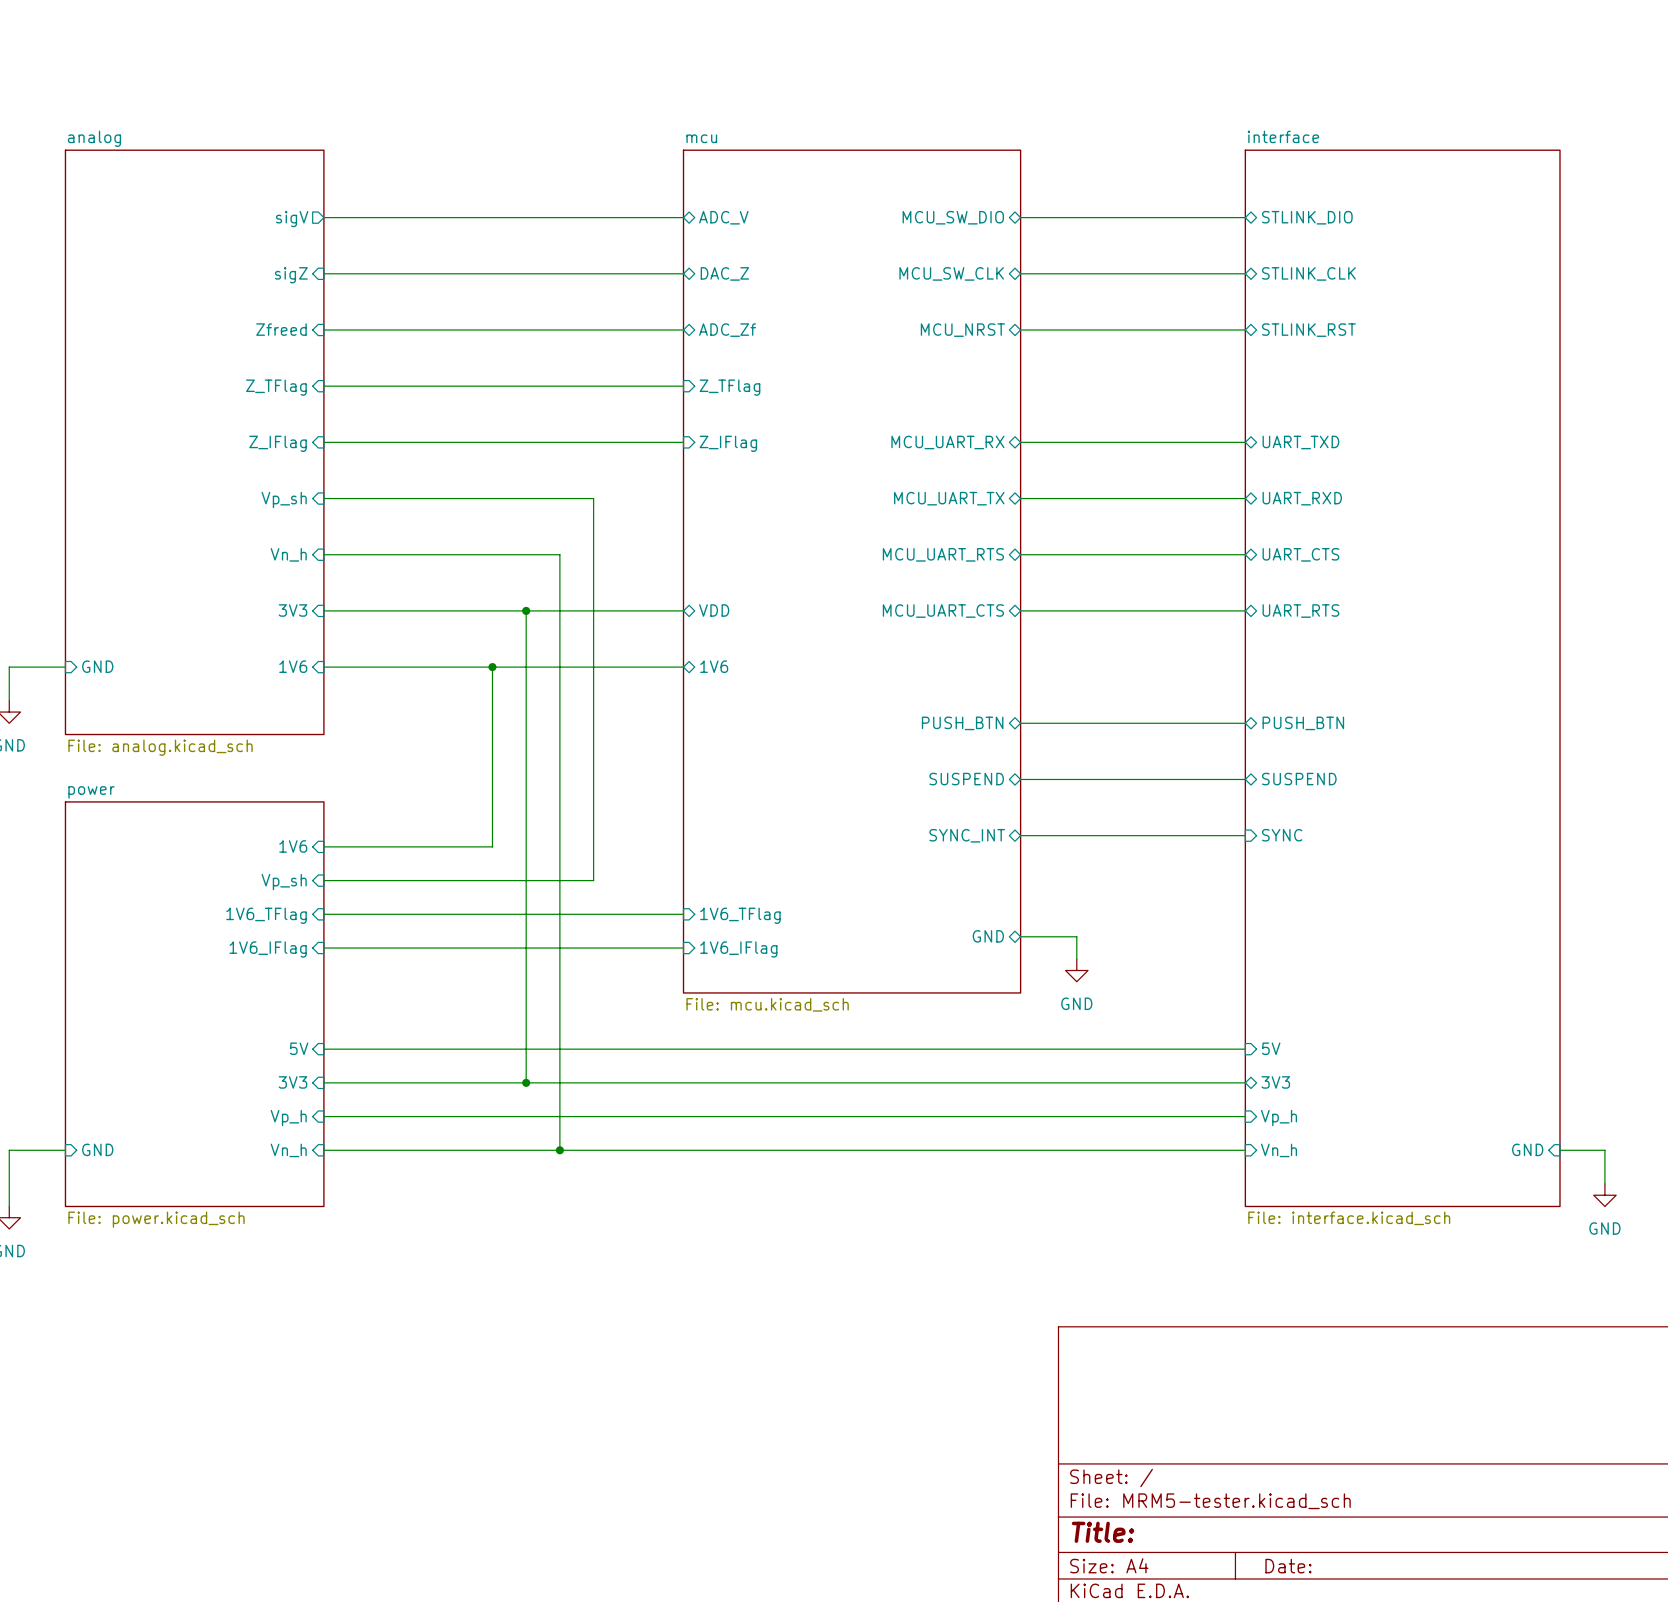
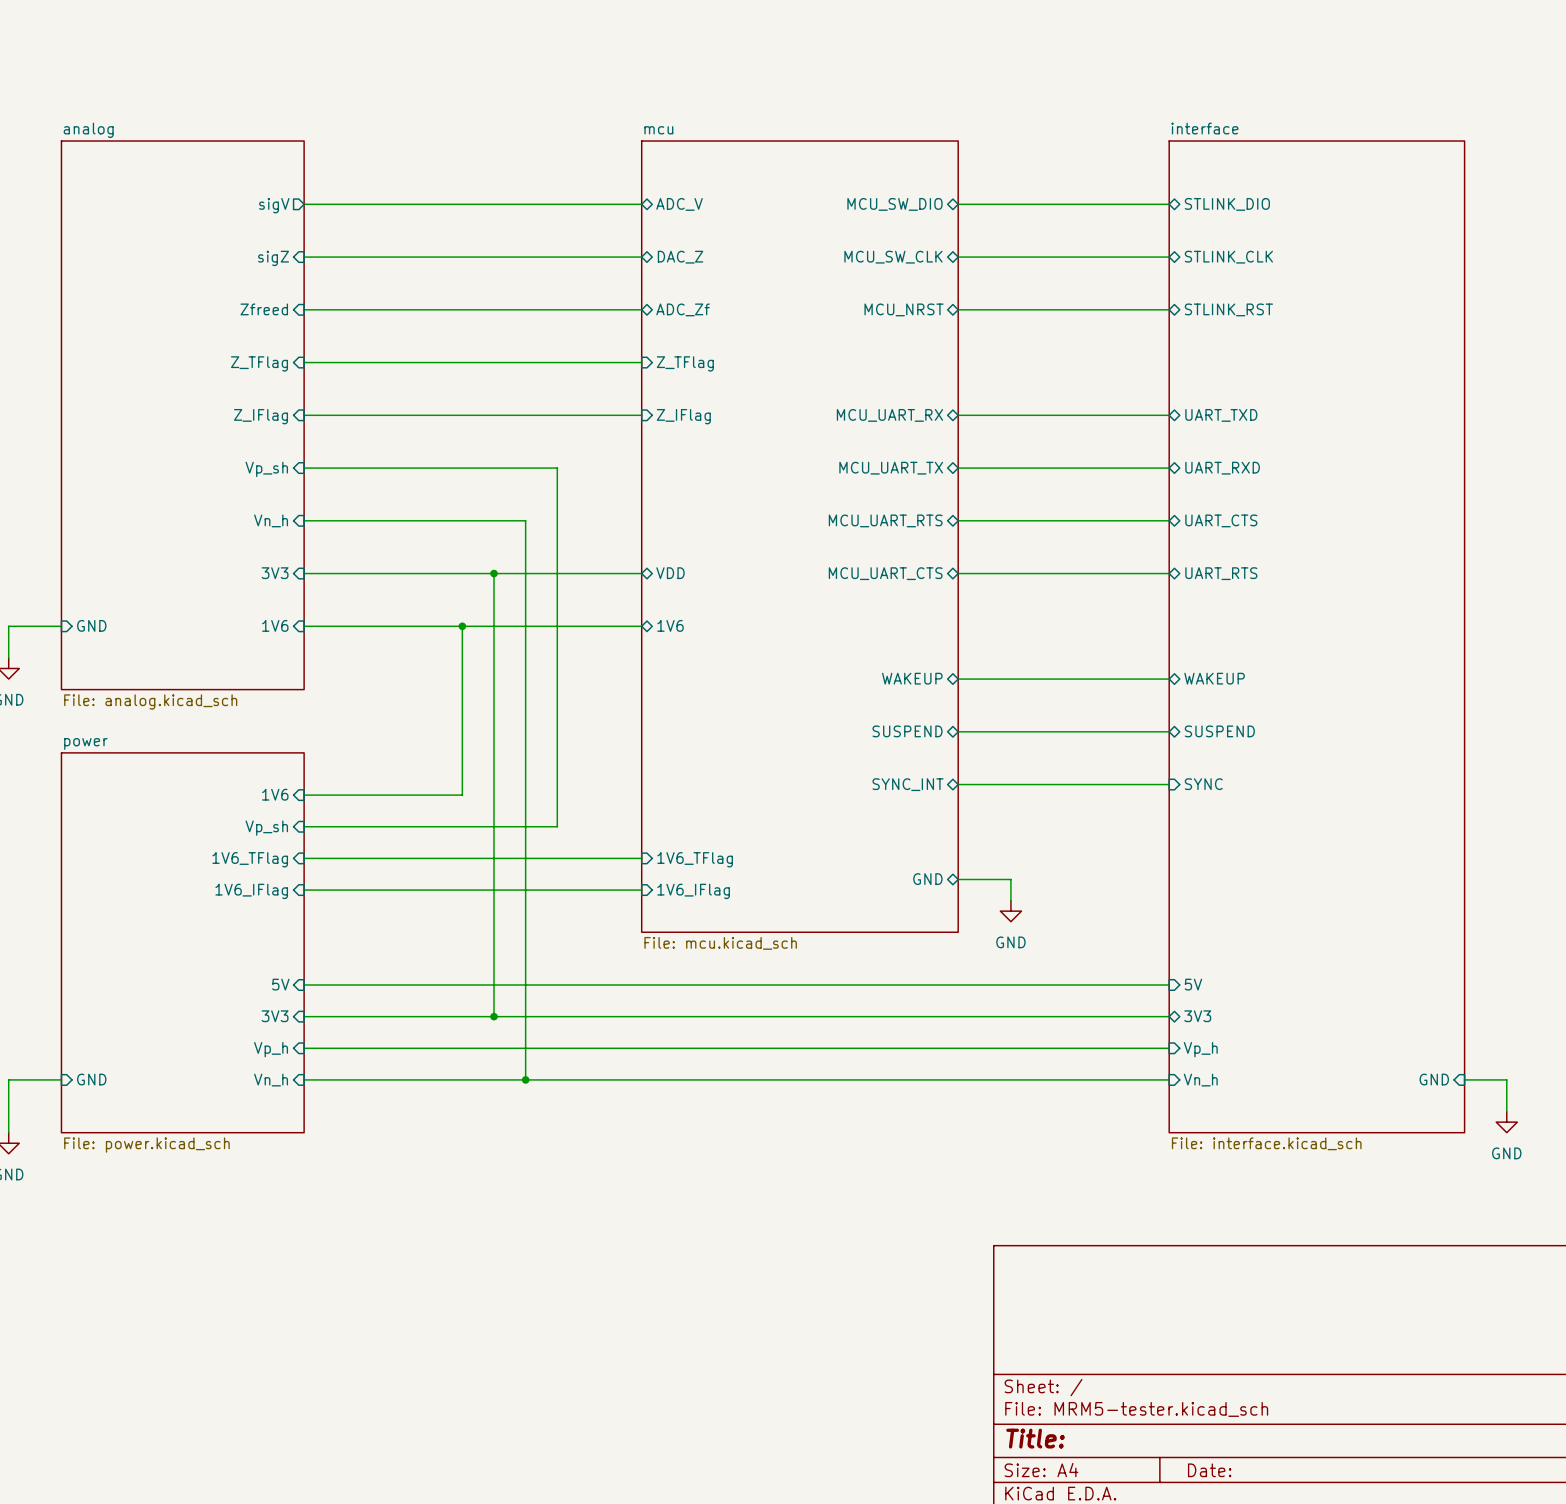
sheet pin: PUSH_BTN (962, 723) -> WAKEUP (912, 678)
sheet pin: PUSH_BTN (1303, 723) -> WAKEUP (1214, 678)

